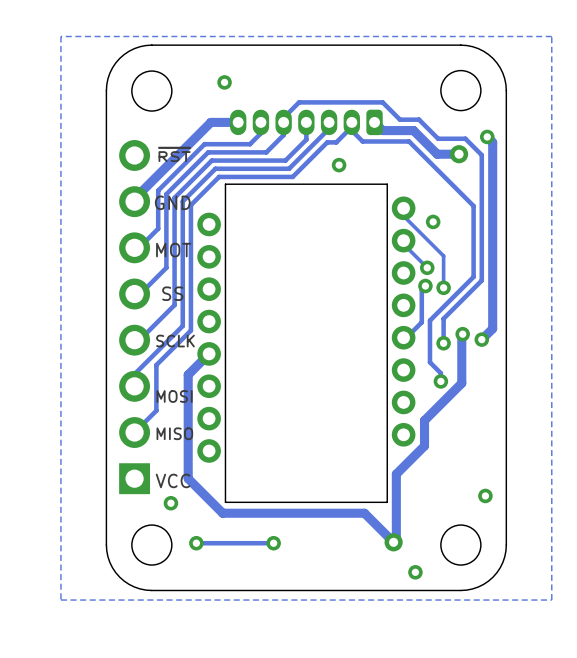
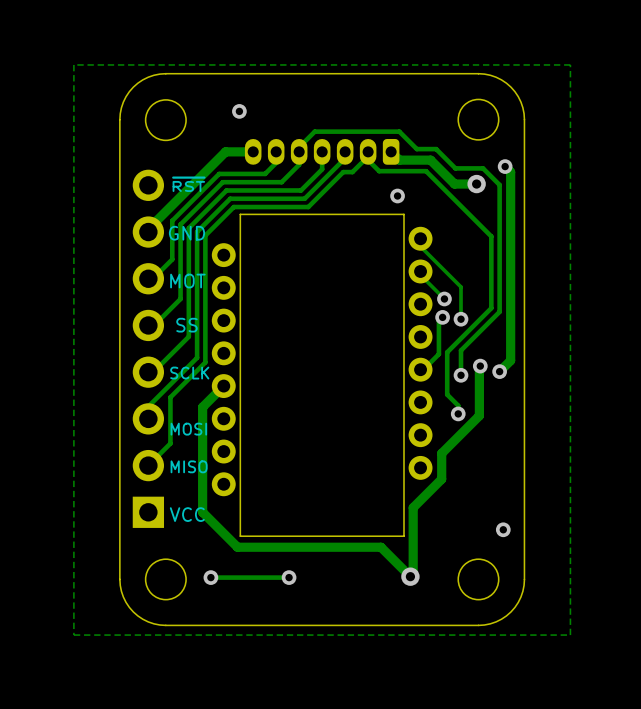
via: (339, 165) -> none
via: none -> (397, 196)
via: (433, 221) -> none
via: (170, 503) -> none
via: (415, 572) -> none

